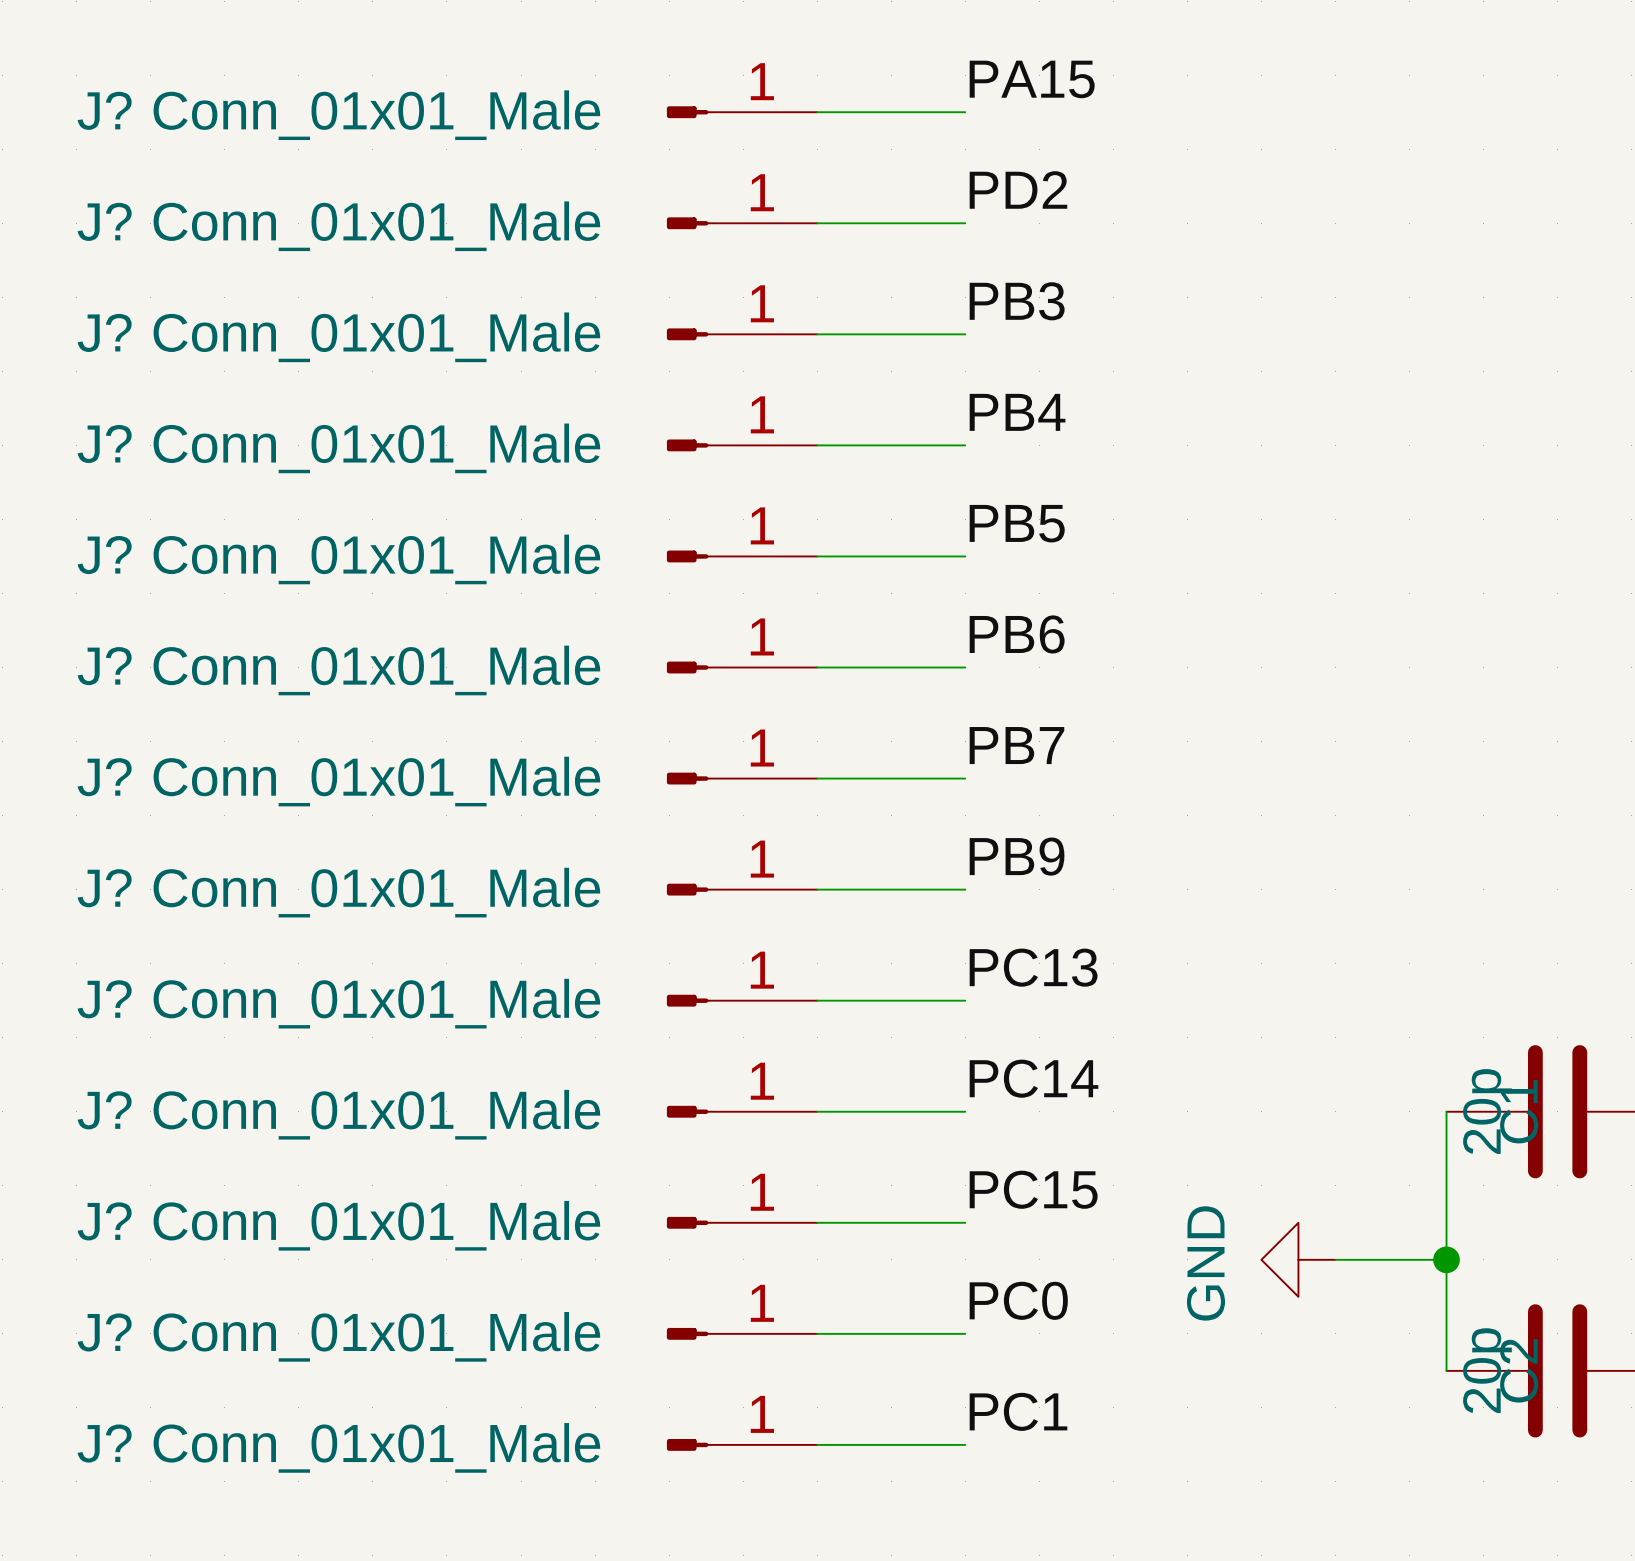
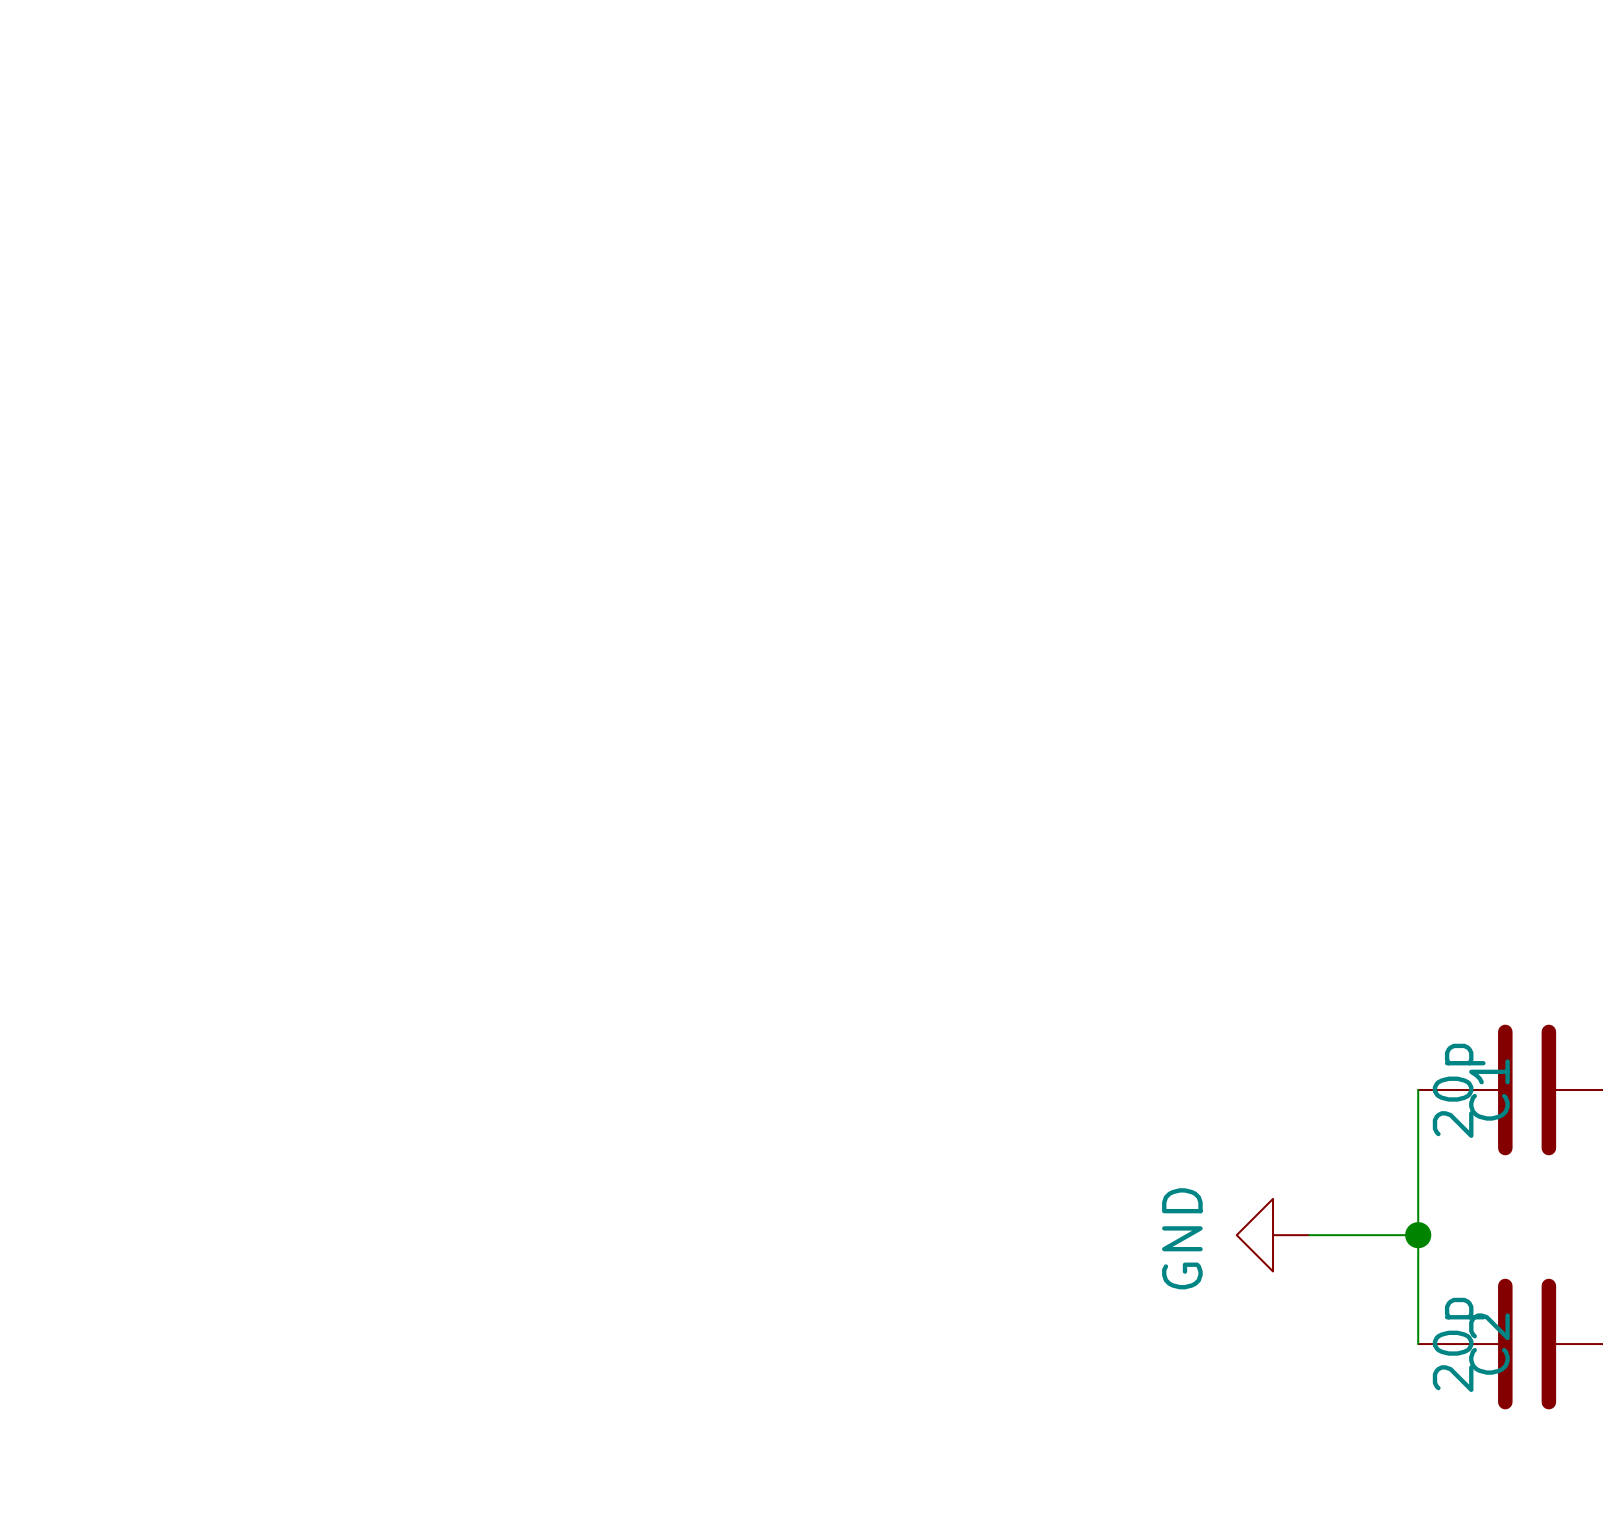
label: PA15 (1032, 79) -> none
J?: Conn_01x01_Male (742, 112) -> none
wire: (817, 112) (965, 112) -> none
label: PD2 (1018, 189) -> none
J?: Conn_01x01_Male (742, 223) -> none
wire: (817, 223) (965, 223) -> none
label: PB3 (1017, 301) -> none
J?: Conn_01x01_Male (742, 334) -> none
wire: (817, 334) (965, 334) -> none
label: PB4 (1017, 412) -> none
J?: Conn_01x01_Male (742, 445) -> none
wire: (817, 445) (965, 445) -> none
label: PB5 (1017, 523) -> none
J?: Conn_01x01_Male (742, 556) -> none
wire: (817, 556) (965, 556) -> none
label: PB6 (1017, 634) -> none
J?: Conn_01x01_Male (742, 667) -> none
wire: (817, 667) (965, 667) -> none
label: PB7 (1016, 745) -> none
J?: Conn_01x01_Male (742, 778) -> none
wire: (817, 778) (965, 778) -> none
label: PB9 (1017, 856) -> none
J?: Conn_01x01_Male (742, 889) -> none
wire: (817, 889) (965, 889) -> none
label: PC13 (1033, 967) -> none
J?: Conn_01x01_Male (742, 1000) -> none
wire: (817, 1000) (965, 1000) -> none
label: PC14 (1033, 1078) -> none
J?: Conn_01x01_Male (742, 1111) -> none
wire: (817, 1111) (965, 1111) -> none
label: PC15 (1033, 1189) -> none
J?: Conn_01x01_Male (742, 1222) -> none
wire: (817, 1222) (965, 1222) -> none
label: PC0 (1018, 1300) -> none
J?: Conn_01x01_Male (742, 1333) -> none
wire: (817, 1333) (965, 1333) -> none
label: PC1 (1018, 1411) -> none
J?: Conn_01x01_Male (742, 1444) -> none
wire: (817, 1444) (965, 1444) -> none

